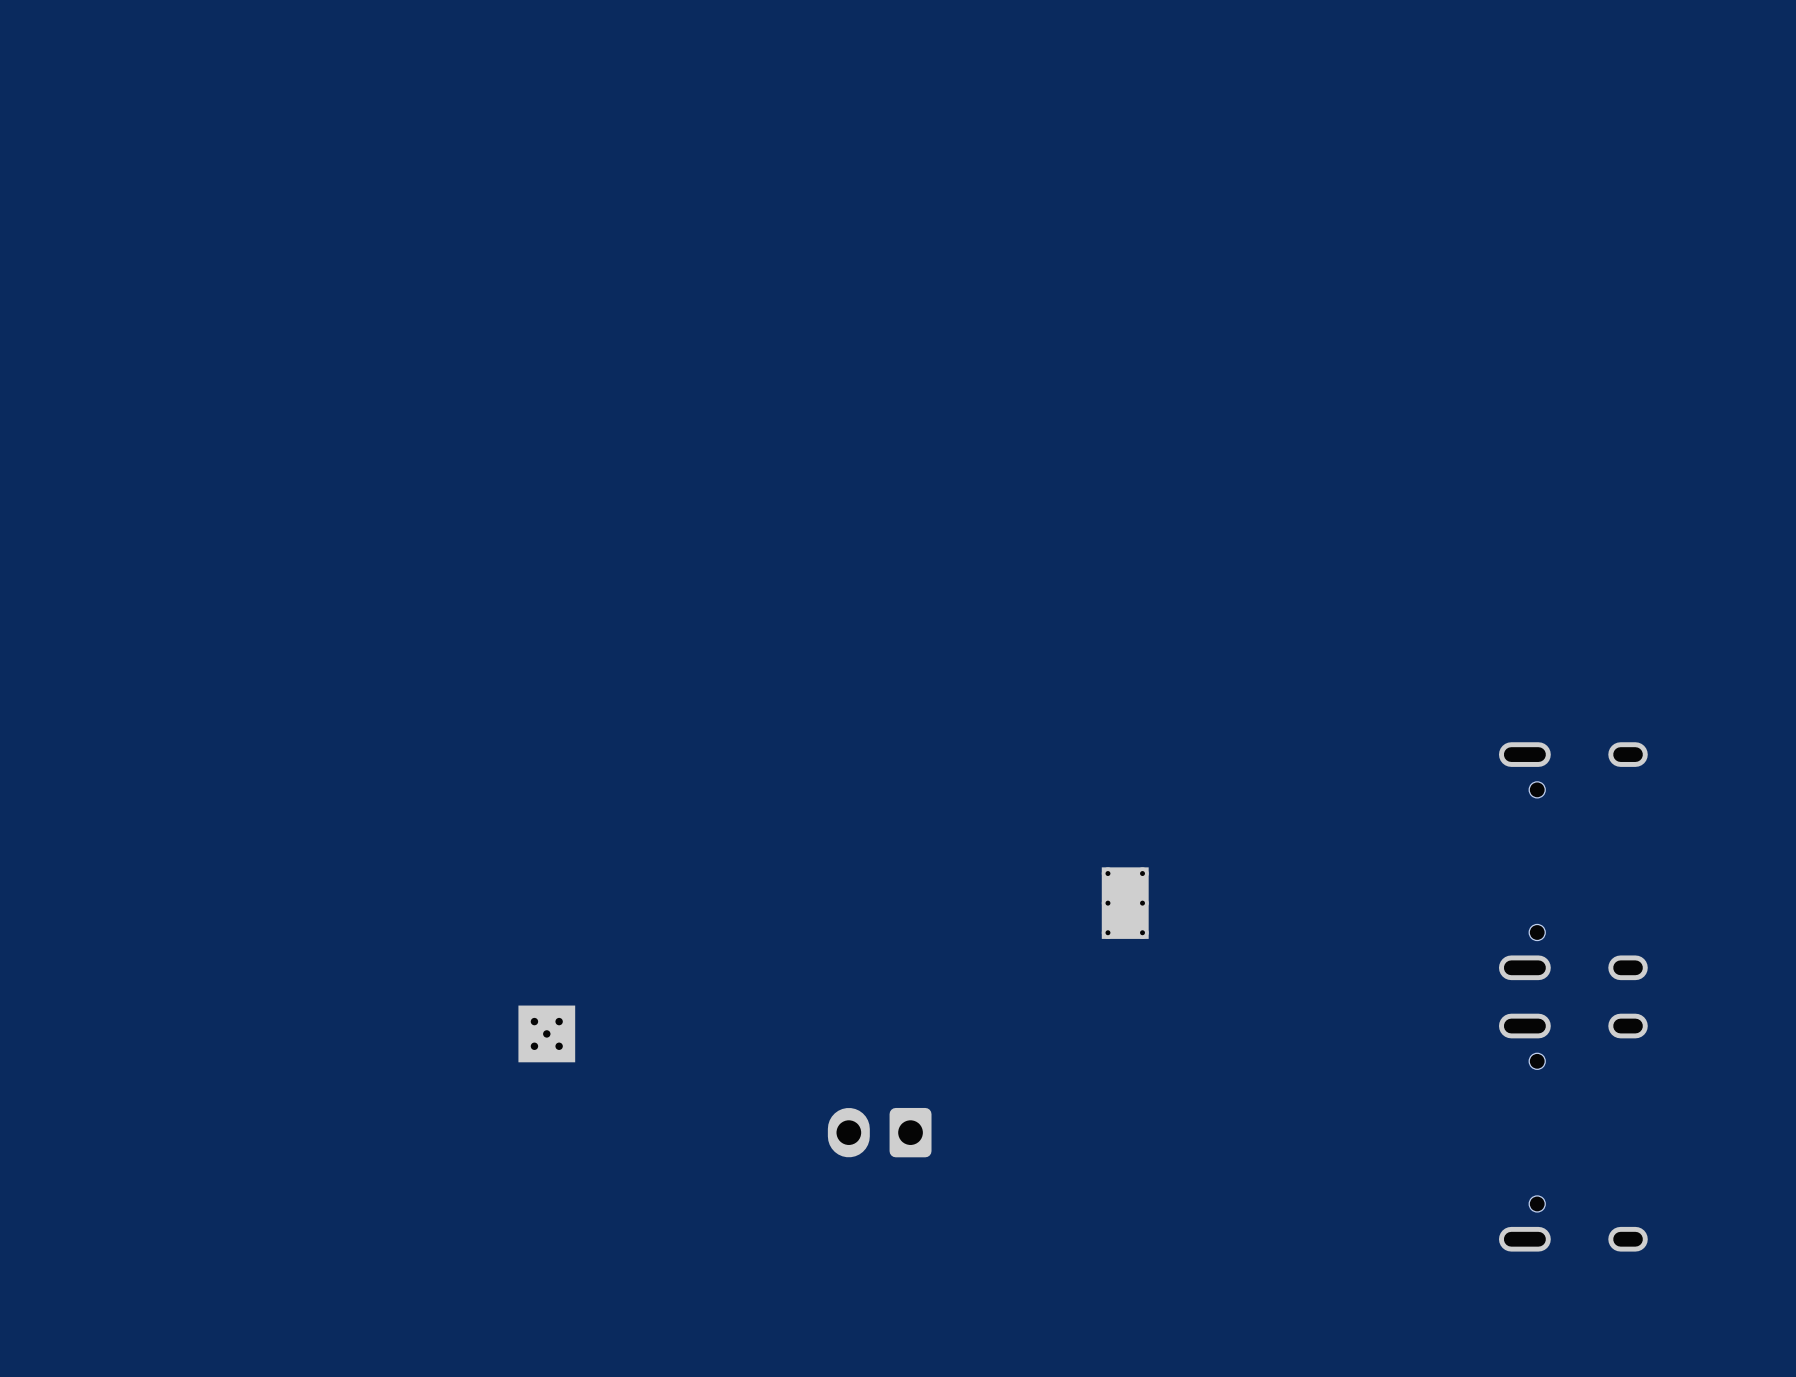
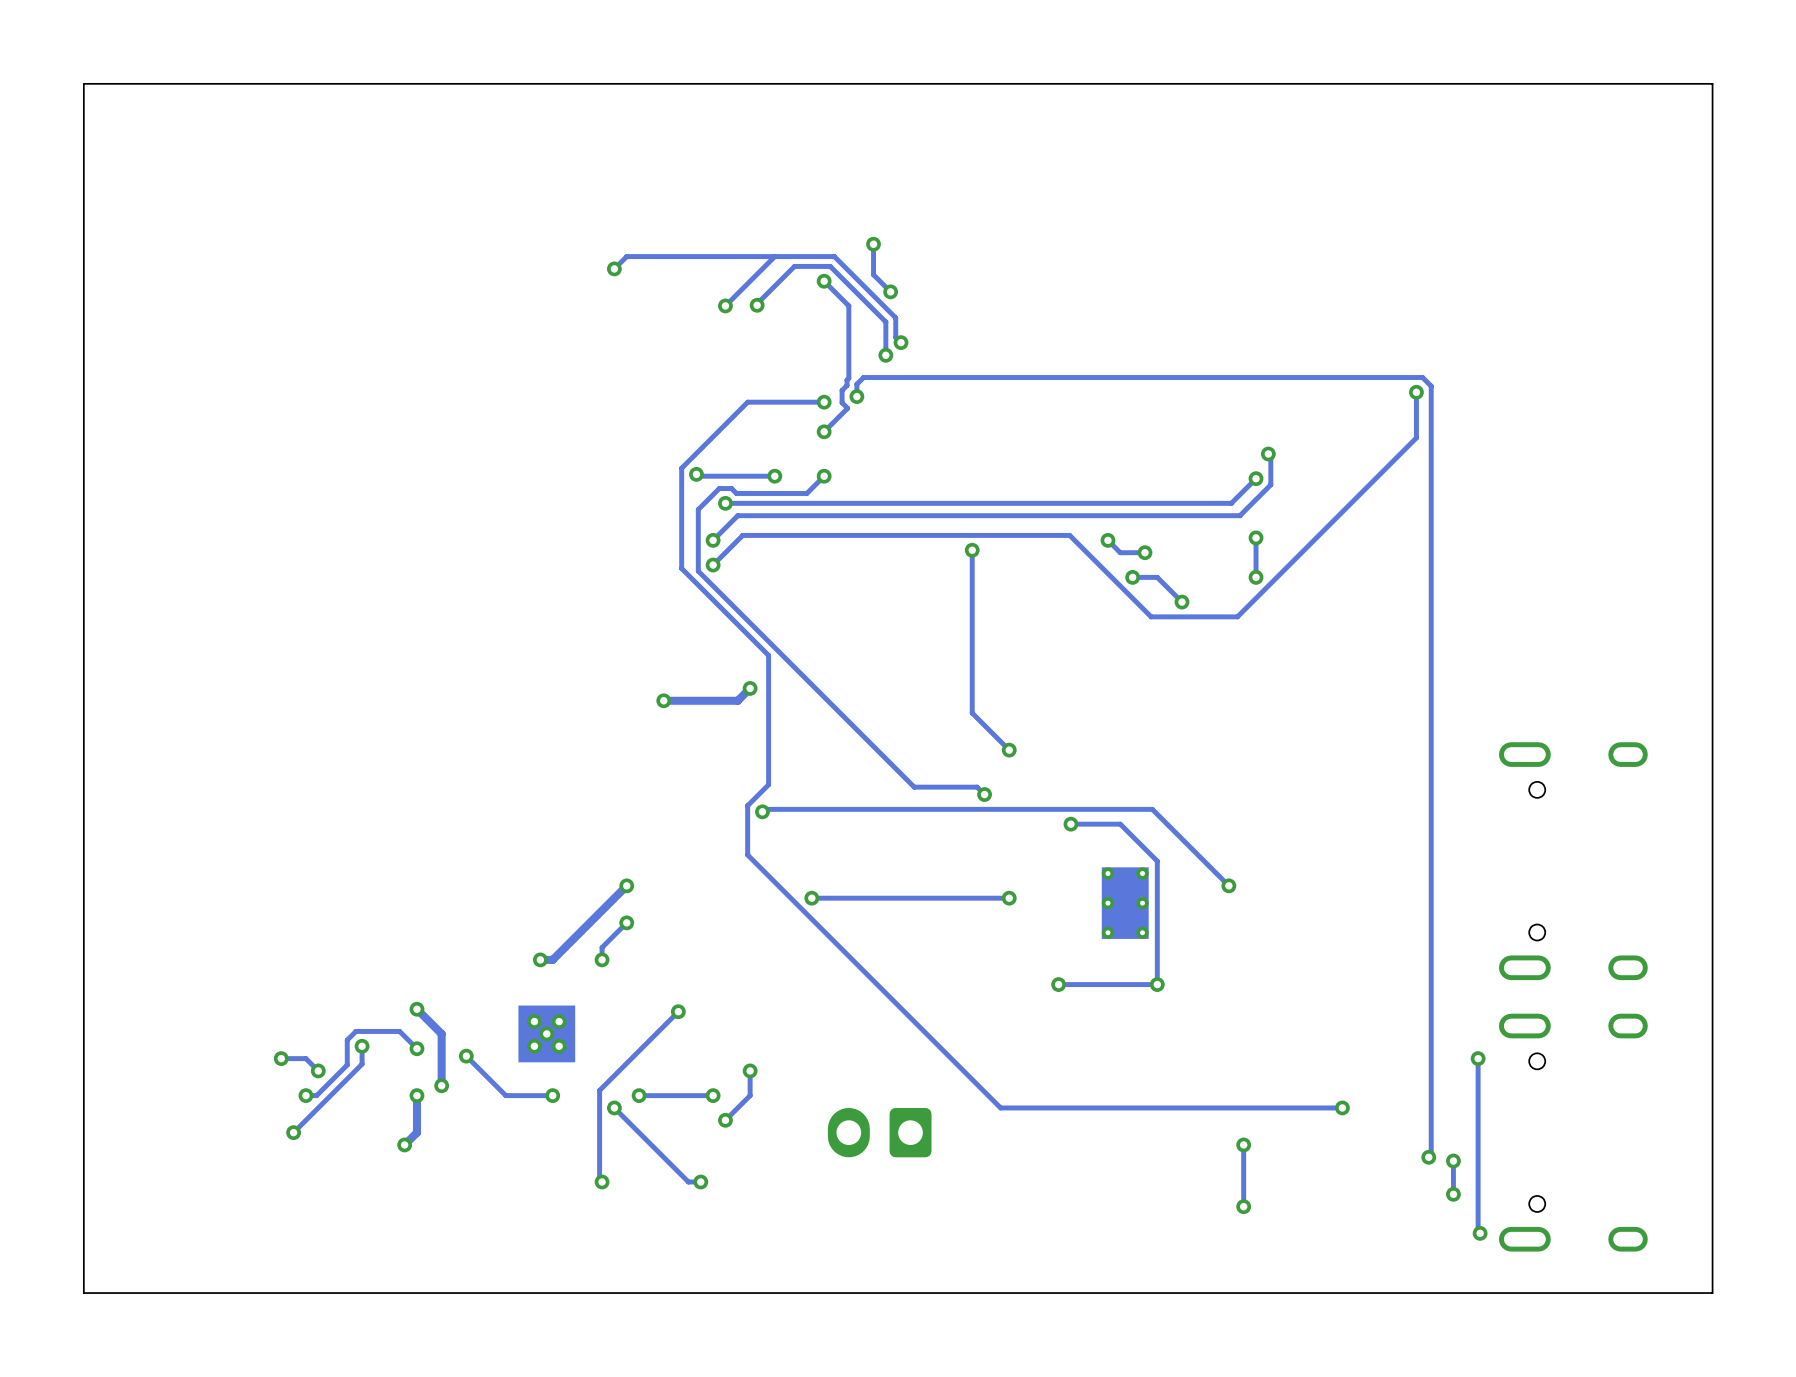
board edge: none -> (1712, 83) (83, 83) (83, 1293) (1712, 1293) (1712, 83)
track: none -> (873, 244) (873, 274) (890, 291)
via: none -> (873, 244)
track: none -> (774, 256) (725, 305)
track: none -> (614, 268) (626, 256) (834, 256) (895, 317) (895, 337) (901, 342)
via: none -> (614, 268)
track: none -> (824, 281) (848, 305) (848, 378) (847, 385) (842, 390) (842, 402) (847, 408) (824, 431)
via: none -> (824, 281)
via: none -> (890, 291)
via: none -> (725, 305)
track: none -> (757, 305) (794, 266) (830, 266) (885, 322) (885, 355)
via: none -> (757, 305)
via: none -> (901, 342)
via: none -> (885, 355)
track: none -> (1416, 392) (1416, 437) (1237, 616) (1151, 616) (1069, 535) (742, 535) (713, 565)
via: none -> (1416, 392)
track: none -> (856, 396) (856, 384) (863, 377) (1422, 377) (1431, 386) (1431, 1154) (1428, 1157)
via: none -> (856, 396)
track: none -> (824, 402) (747, 402) (681, 468) (681, 568) (768, 655) (768, 784) (747, 805) (747, 854) (1000, 1107) (1342, 1107)
via: none -> (824, 402)
via: none -> (824, 431)
track: none -> (1268, 454) (1270, 456) (1270, 484) (1239, 515) (737, 515) (713, 540)
via: none -> (1268, 454)
track: none -> (696, 474) (698, 476) (774, 476)
via: none -> (696, 474)
via: none -> (774, 476)
track: none -> (824, 476) (806, 493) (736, 493) (731, 488) (719, 488) (698, 509) (698, 571) (914, 787) (977, 787) (984, 794)
via: none -> (824, 476)
track: none -> (1256, 478) (1231, 503) (725, 503)
via: none -> (1256, 478)
via: none -> (725, 503)
track: none -> (1256, 537) (1256, 577)
via: none -> (1256, 537)
via: none -> (713, 540)
track: none -> (1107, 540) (1120, 552) (1144, 552)
via: none -> (1107, 540)
track: none -> (972, 550) (972, 713) (1009, 750)
via: none -> (972, 550)
via: none -> (1144, 552)
via: none -> (713, 565)
track: none -> (1132, 577) (1157, 577) (1181, 602)
via: none -> (1132, 577)
via: none -> (1256, 577)
via: none -> (1181, 602)
track: none -> (750, 688) (737, 700) (663, 700)
via: none -> (750, 688)
via: none -> (663, 700)
via: none -> (1009, 750)
via: none -> (984, 794)
track: none -> (762, 811) (764, 809) (1152, 809) (1228, 885)
via: none -> (762, 811)
track: none -> (1070, 824) (1120, 824) (1157, 861) (1157, 984) (1058, 984)
via: none -> (1070, 824)
track: none -> (626, 885) (552, 959) (540, 959)
via: none -> (626, 885)
via: none -> (1228, 885)
via: none -> (811, 898)
track: none -> (1009, 898) (811, 898)
via: none -> (1009, 898)
track: none -> (626, 922) (602, 947) (602, 959)
via: none -> (626, 922)
via: none -> (540, 959)
via: none -> (602, 959)
via: none -> (1058, 984)
via: none -> (1157, 984)
track: none -> (416, 1009) (441, 1033) (441, 1085)
via: none -> (416, 1009)
track: none -> (678, 1011) (599, 1090) (599, 1179) (602, 1181)
via: none -> (678, 1011)
track: none -> (362, 1046) (362, 1064) (293, 1132)
via: none -> (362, 1046)
track: none -> (416, 1048) (399, 1031) (355, 1031) (347, 1040) (347, 1065) (316, 1095) (305, 1095)
via: none -> (416, 1048)
track: none -> (466, 1056) (505, 1095) (552, 1095)
via: none -> (466, 1056)
track: none -> (281, 1058) (305, 1058) (318, 1070)
via: none -> (281, 1058)
track: none -> (1478, 1058) (1478, 1231) (1480, 1233)
via: none -> (1478, 1058)
via: none -> (318, 1070)
track: none -> (750, 1070) (750, 1095) (725, 1120)
via: none -> (750, 1070)
via: none -> (441, 1085)
via: none -> (305, 1095)
track: none -> (416, 1095) (416, 1132) (404, 1144)
via: none -> (416, 1095)
via: none -> (552, 1095)
via: none -> (639, 1095)
track: none -> (713, 1095) (639, 1095)
via: none -> (713, 1095)
track: none -> (614, 1107) (688, 1181) (700, 1181)
via: none -> (614, 1107)
via: none -> (1342, 1107)
via: none -> (725, 1120)
via: none -> (293, 1132)
via: none -> (404, 1144)
track: none -> (1243, 1144) (1243, 1206)
via: none -> (1243, 1144)
via: none -> (1428, 1157)
track: none -> (1453, 1161) (1453, 1194)
via: none -> (1453, 1161)
via: none -> (602, 1181)
via: none -> (700, 1181)
via: none -> (1453, 1194)
via: none -> (1243, 1206)
via: none -> (1480, 1233)

